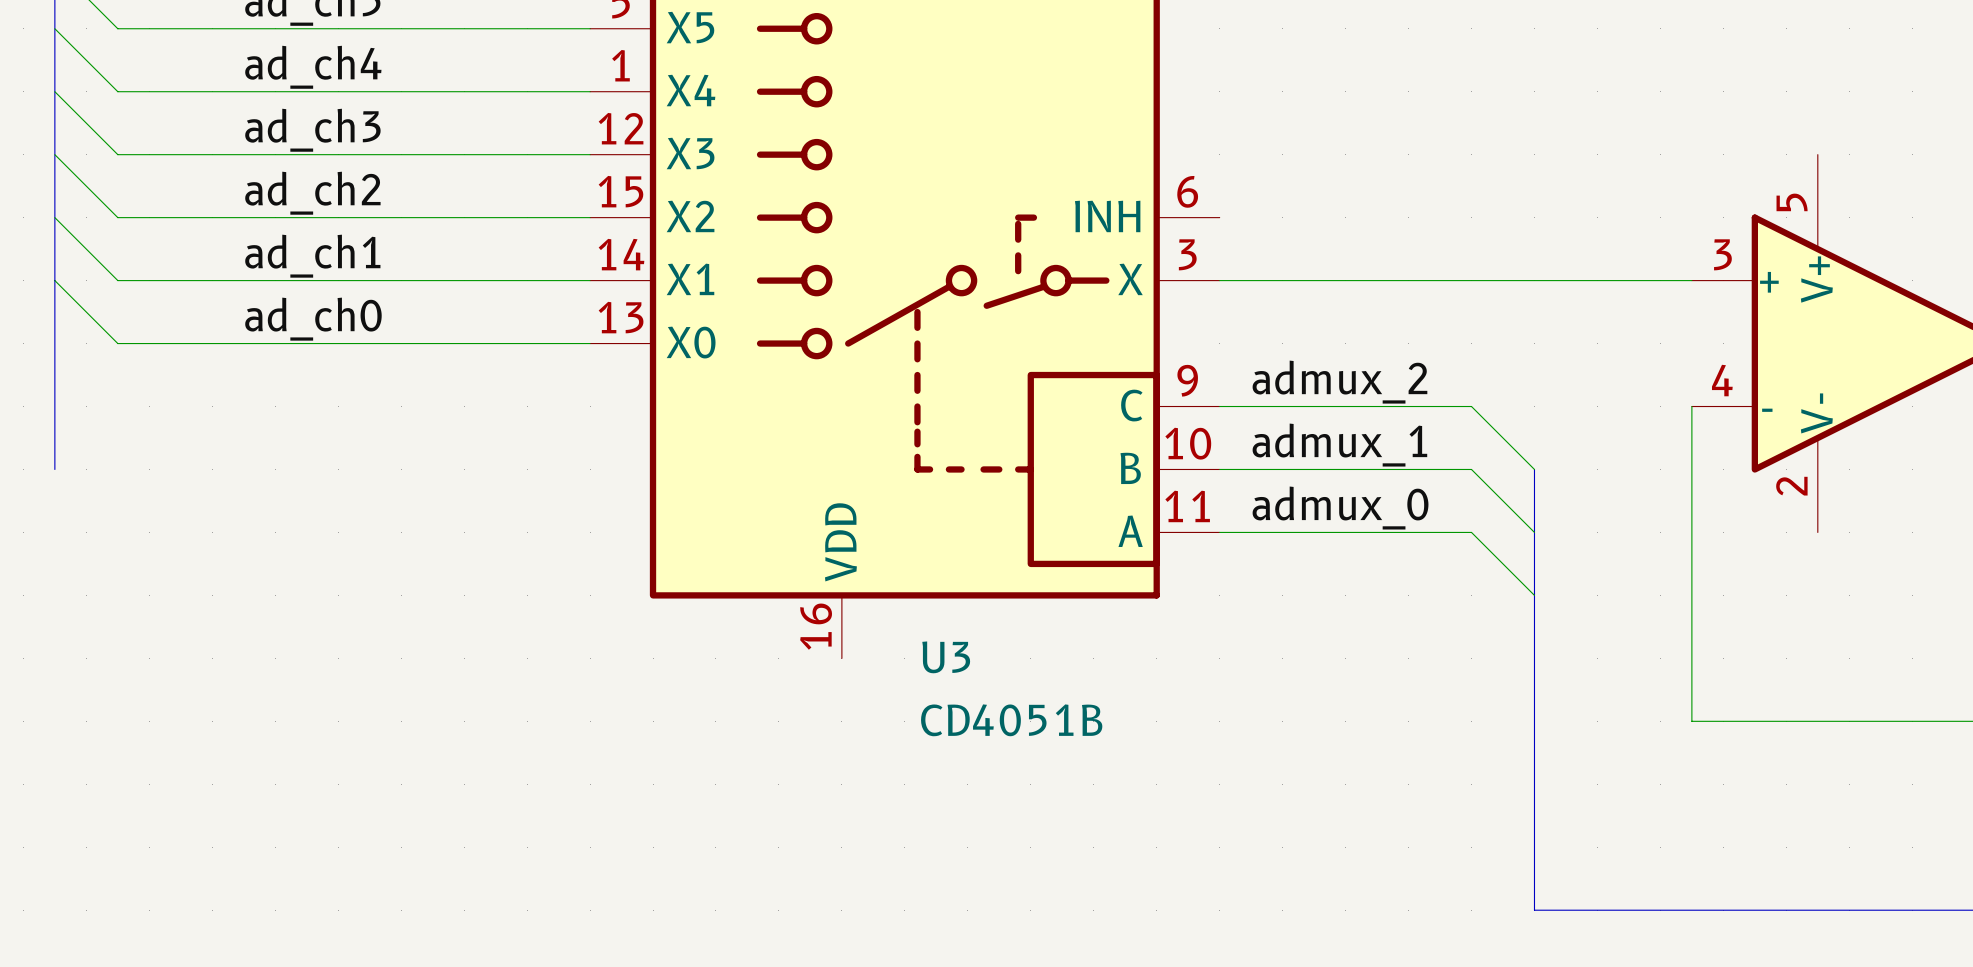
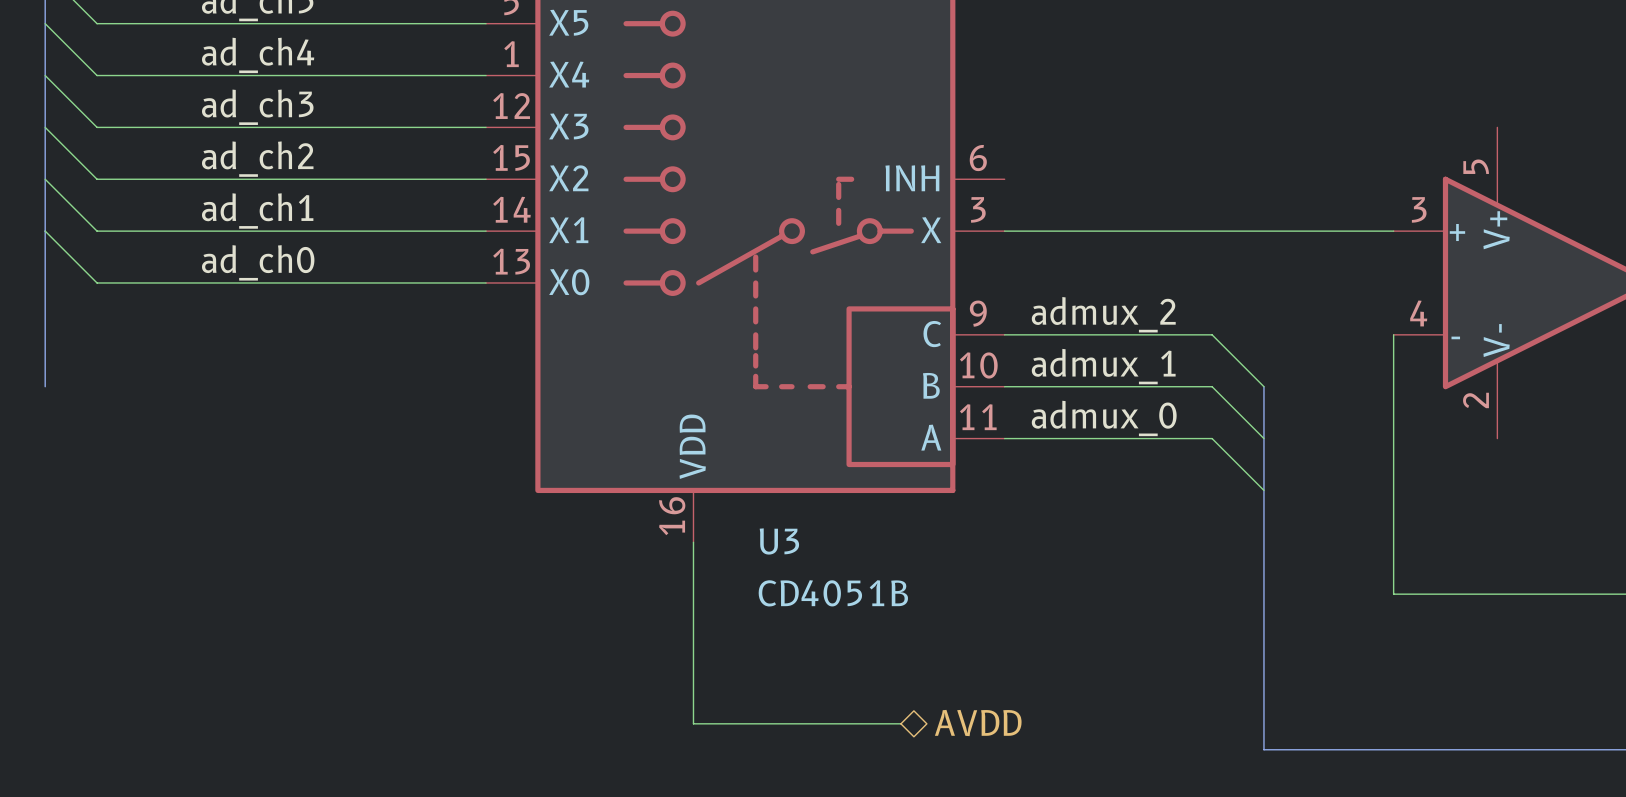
wire: none -> (693, 542) (693, 723) (900, 723)
hierarchical label: none -> AVDD (978, 723)

